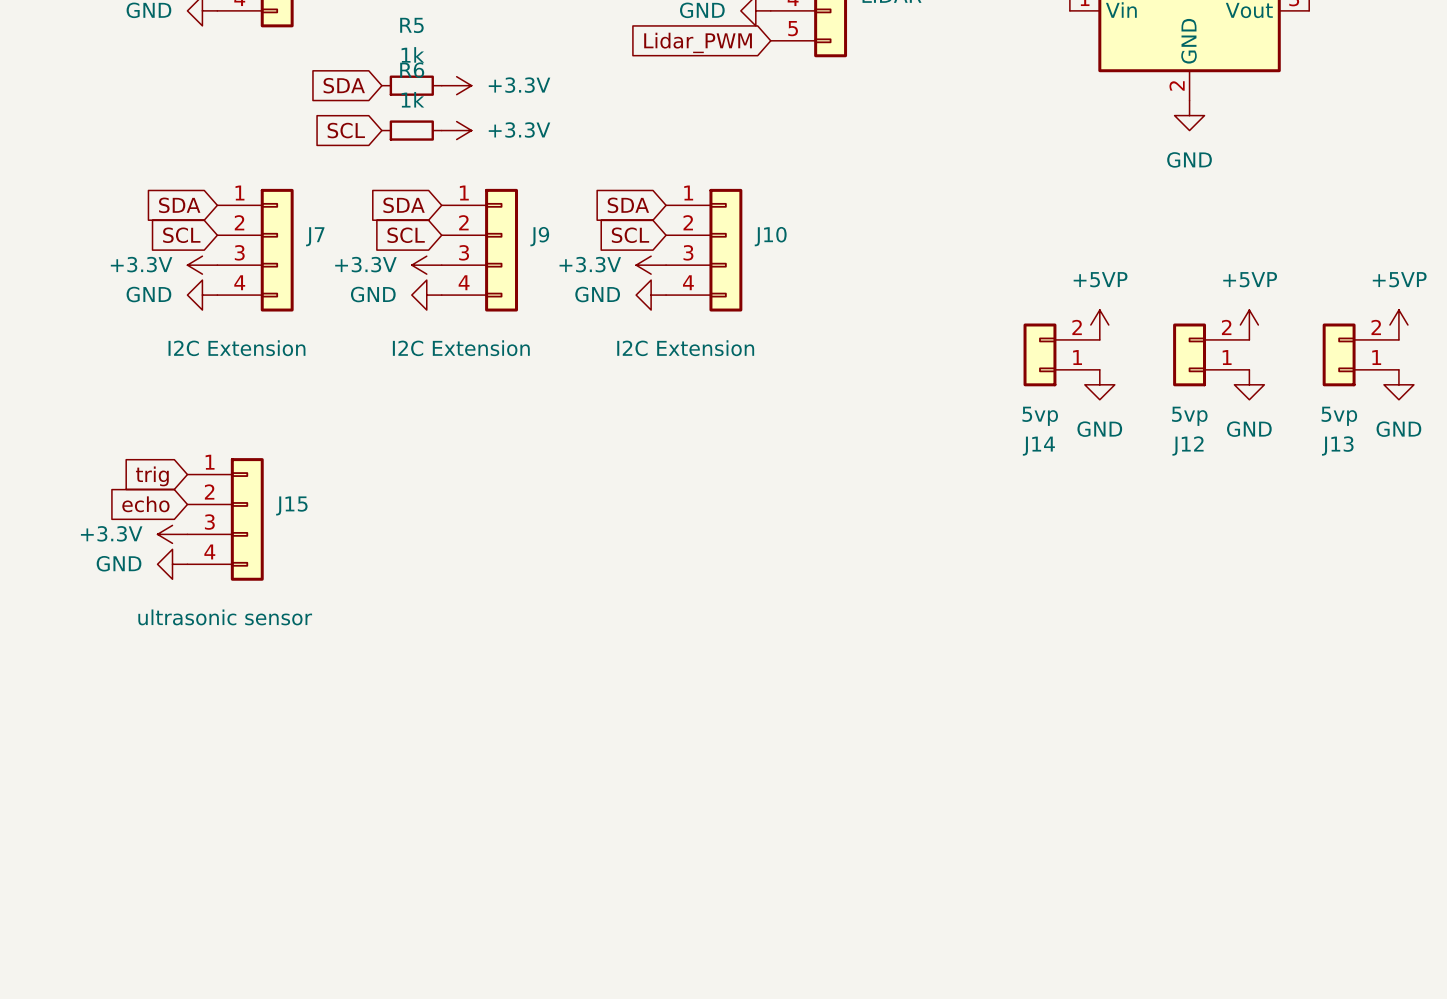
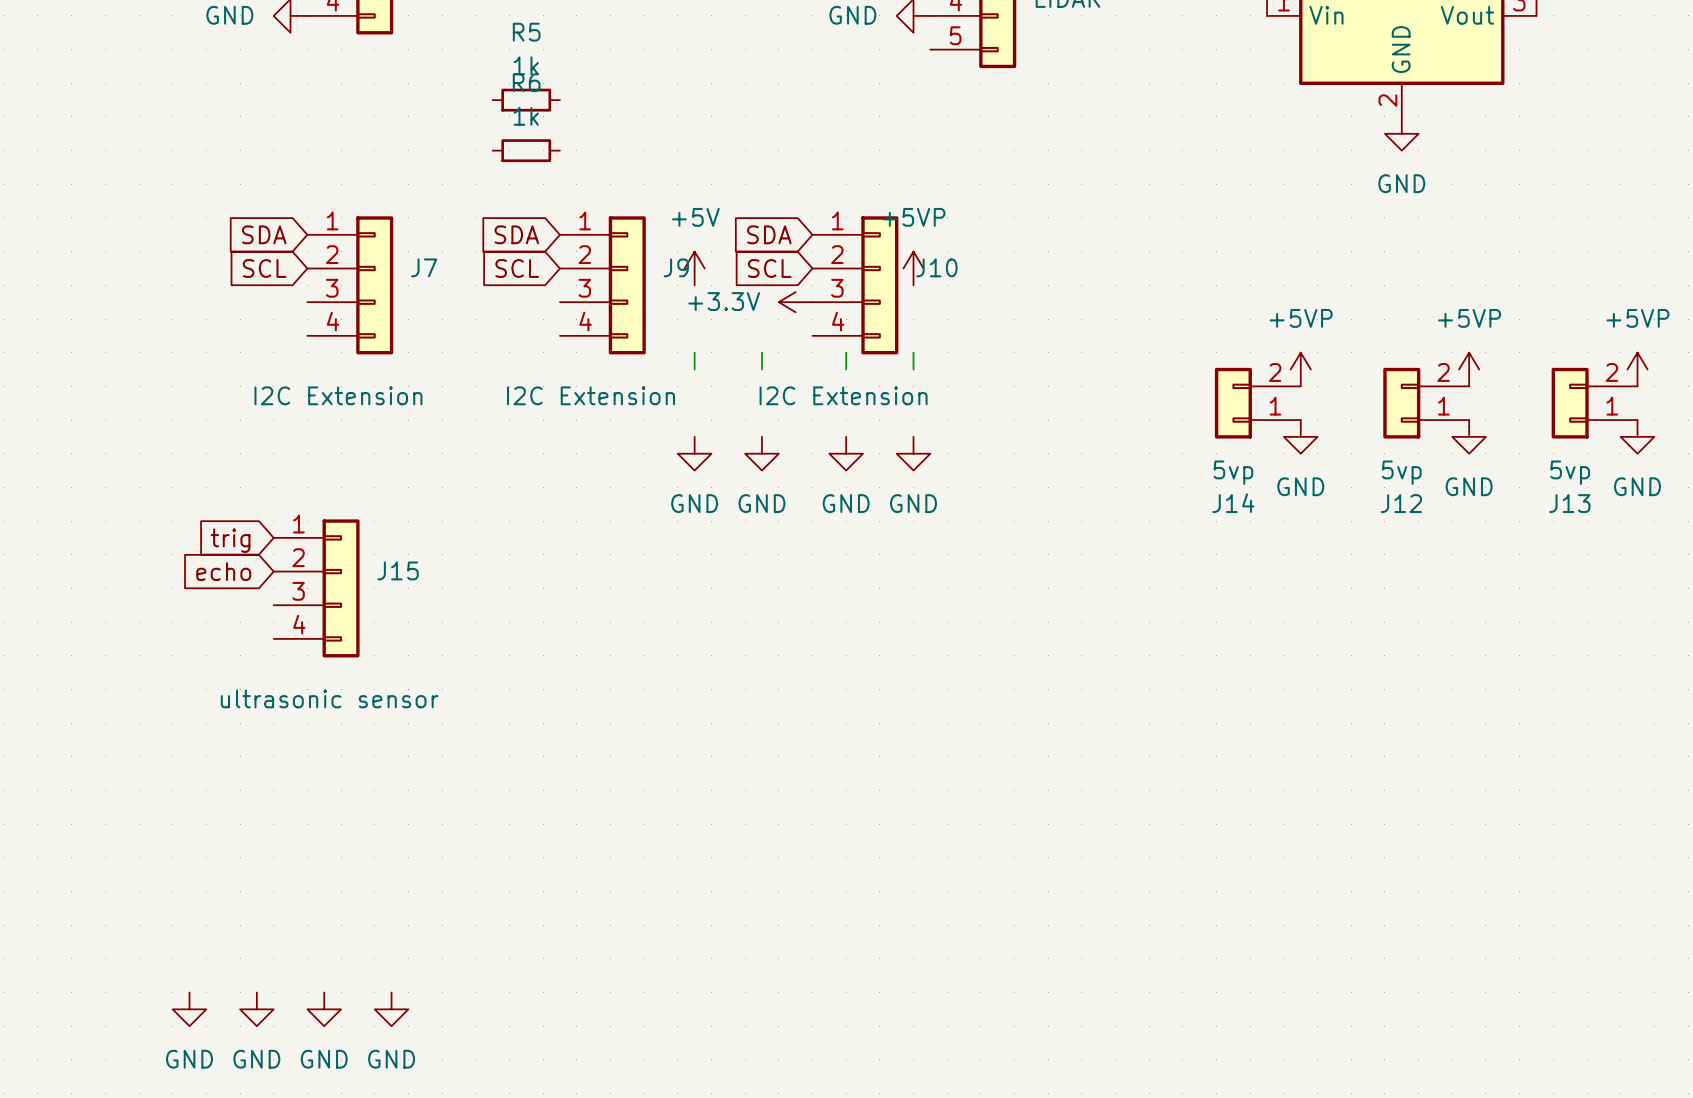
global label: Lidar_PWM (698, 42) -> none
global label: SDA (344, 85) -> none
power symbol: +3.3V (456, 85) -> none
global label: SCL (346, 130) -> none
power symbol: +3.3V (456, 130) -> none
power symbol: none -> +5V (694, 268)
power symbol: none -> +5VP (913, 268)
power symbol: +3.3V (202, 265) -> none
power symbol: +3.3V (426, 265) -> none
power symbol: GND (202, 295) -> none
power symbol: GND (426, 295) -> none
power symbol: GND (651, 295) -> none
wire: none -> (694, 352) (694, 369)
wire: none -> (761, 352) (761, 369)
wire: none -> (846, 352) (846, 369)
wire: none -> (913, 352) (913, 369)
power symbol: none -> GND (694, 453)
power symbol: none -> GND (761, 453)
power symbol: none -> GND (846, 453)
power symbol: none -> GND (913, 453)
power symbol: +3.3V (172, 534) -> none
power symbol: GND (172, 564) -> none
power symbol: none -> GND (189, 1009)
power symbol: none -> GND (256, 1009)
power symbol: none -> GND (324, 1009)
power symbol: none -> GND (391, 1009)

